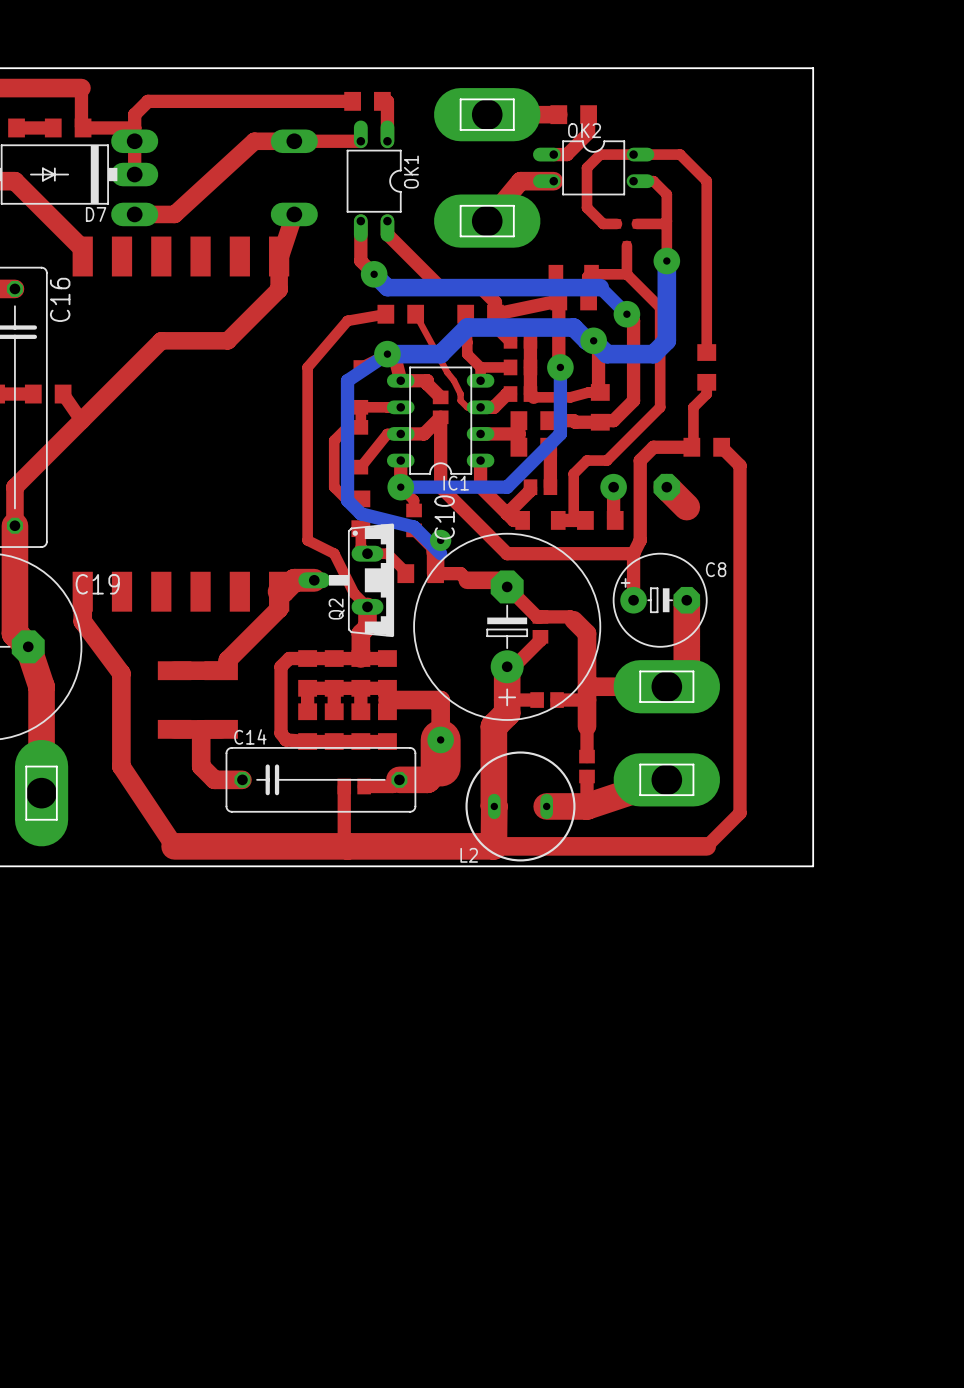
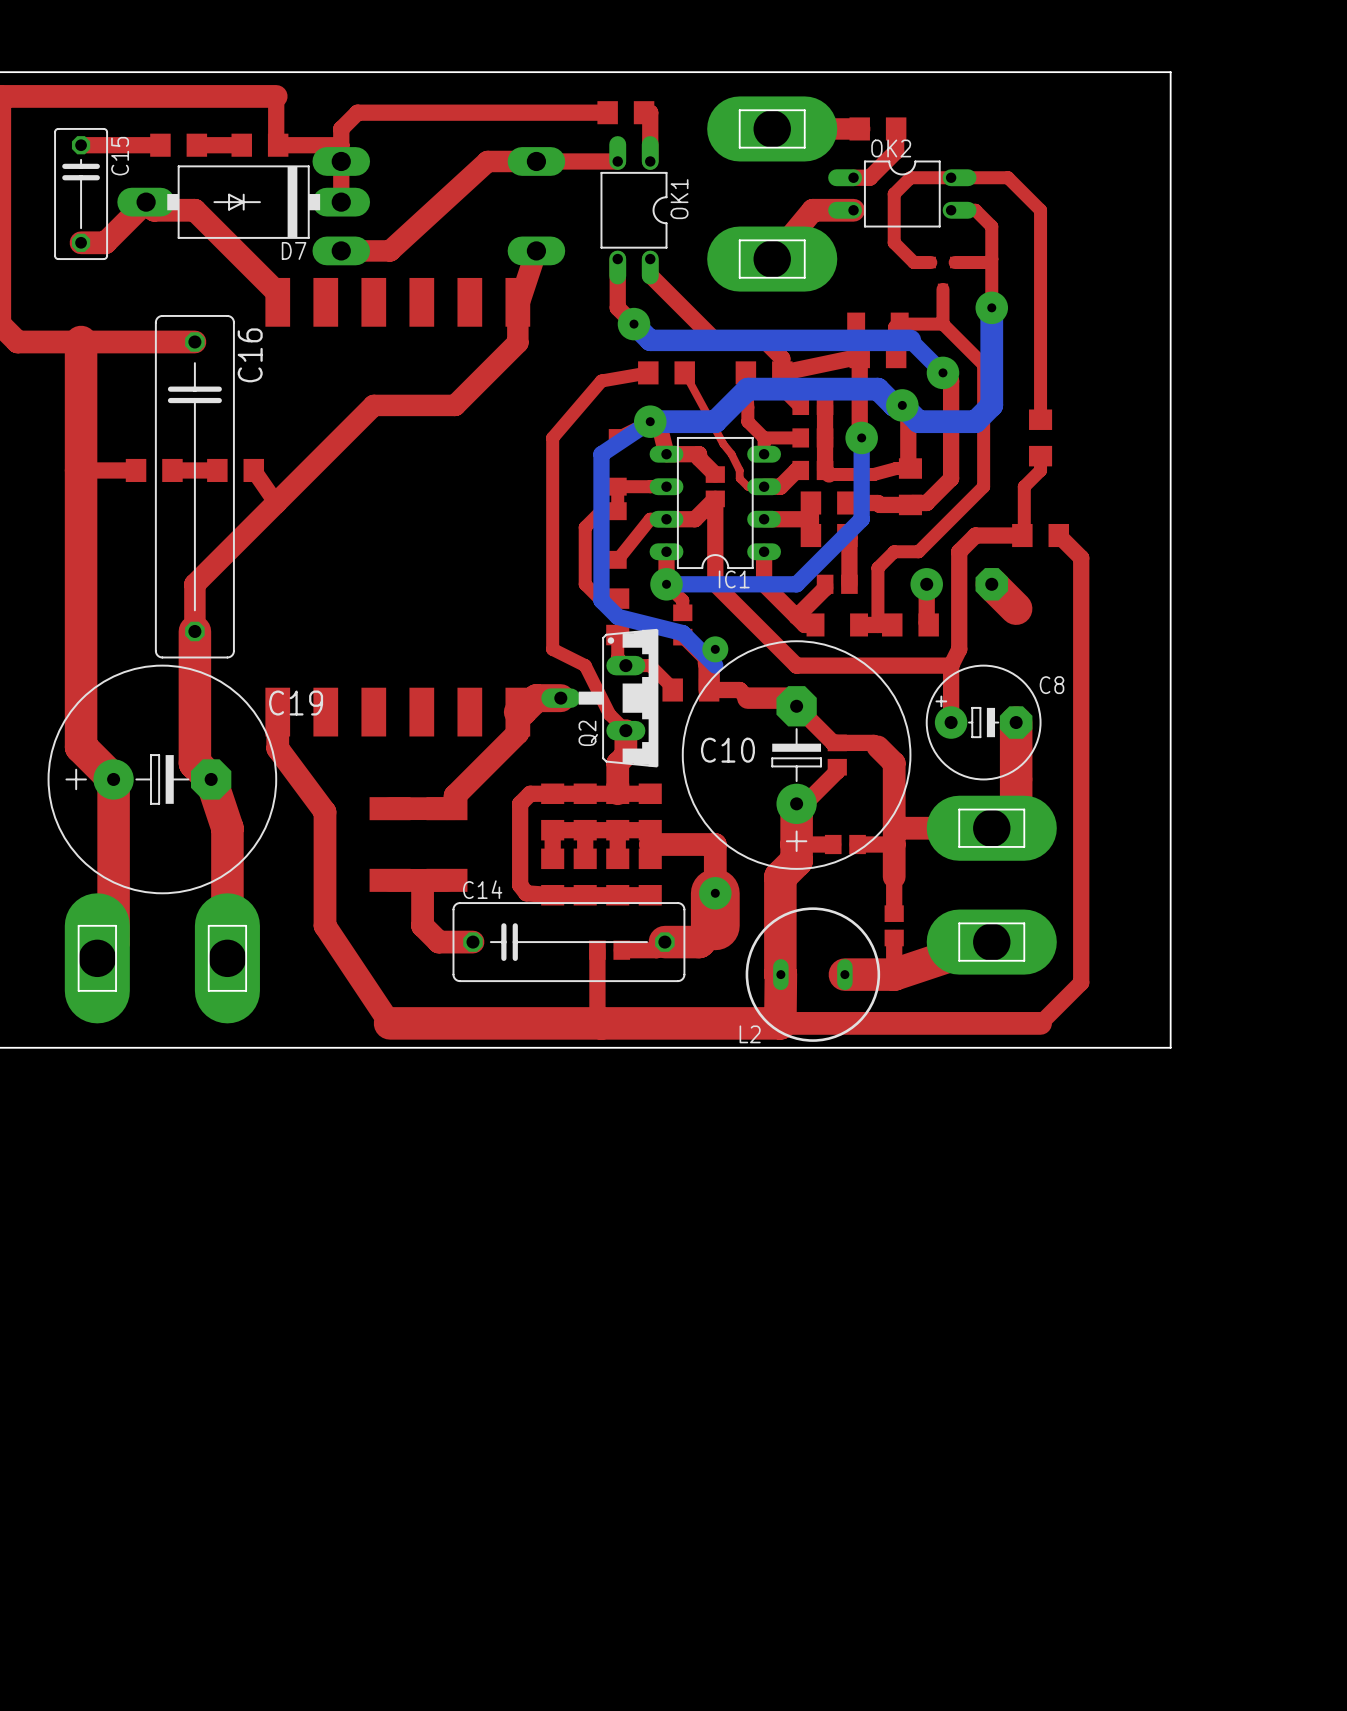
C10 name rotation: 0° (444, 517) -> 90° clockwise (727, 750)
C10 name position: C10 (444, 517) -> C10 (727, 750)

